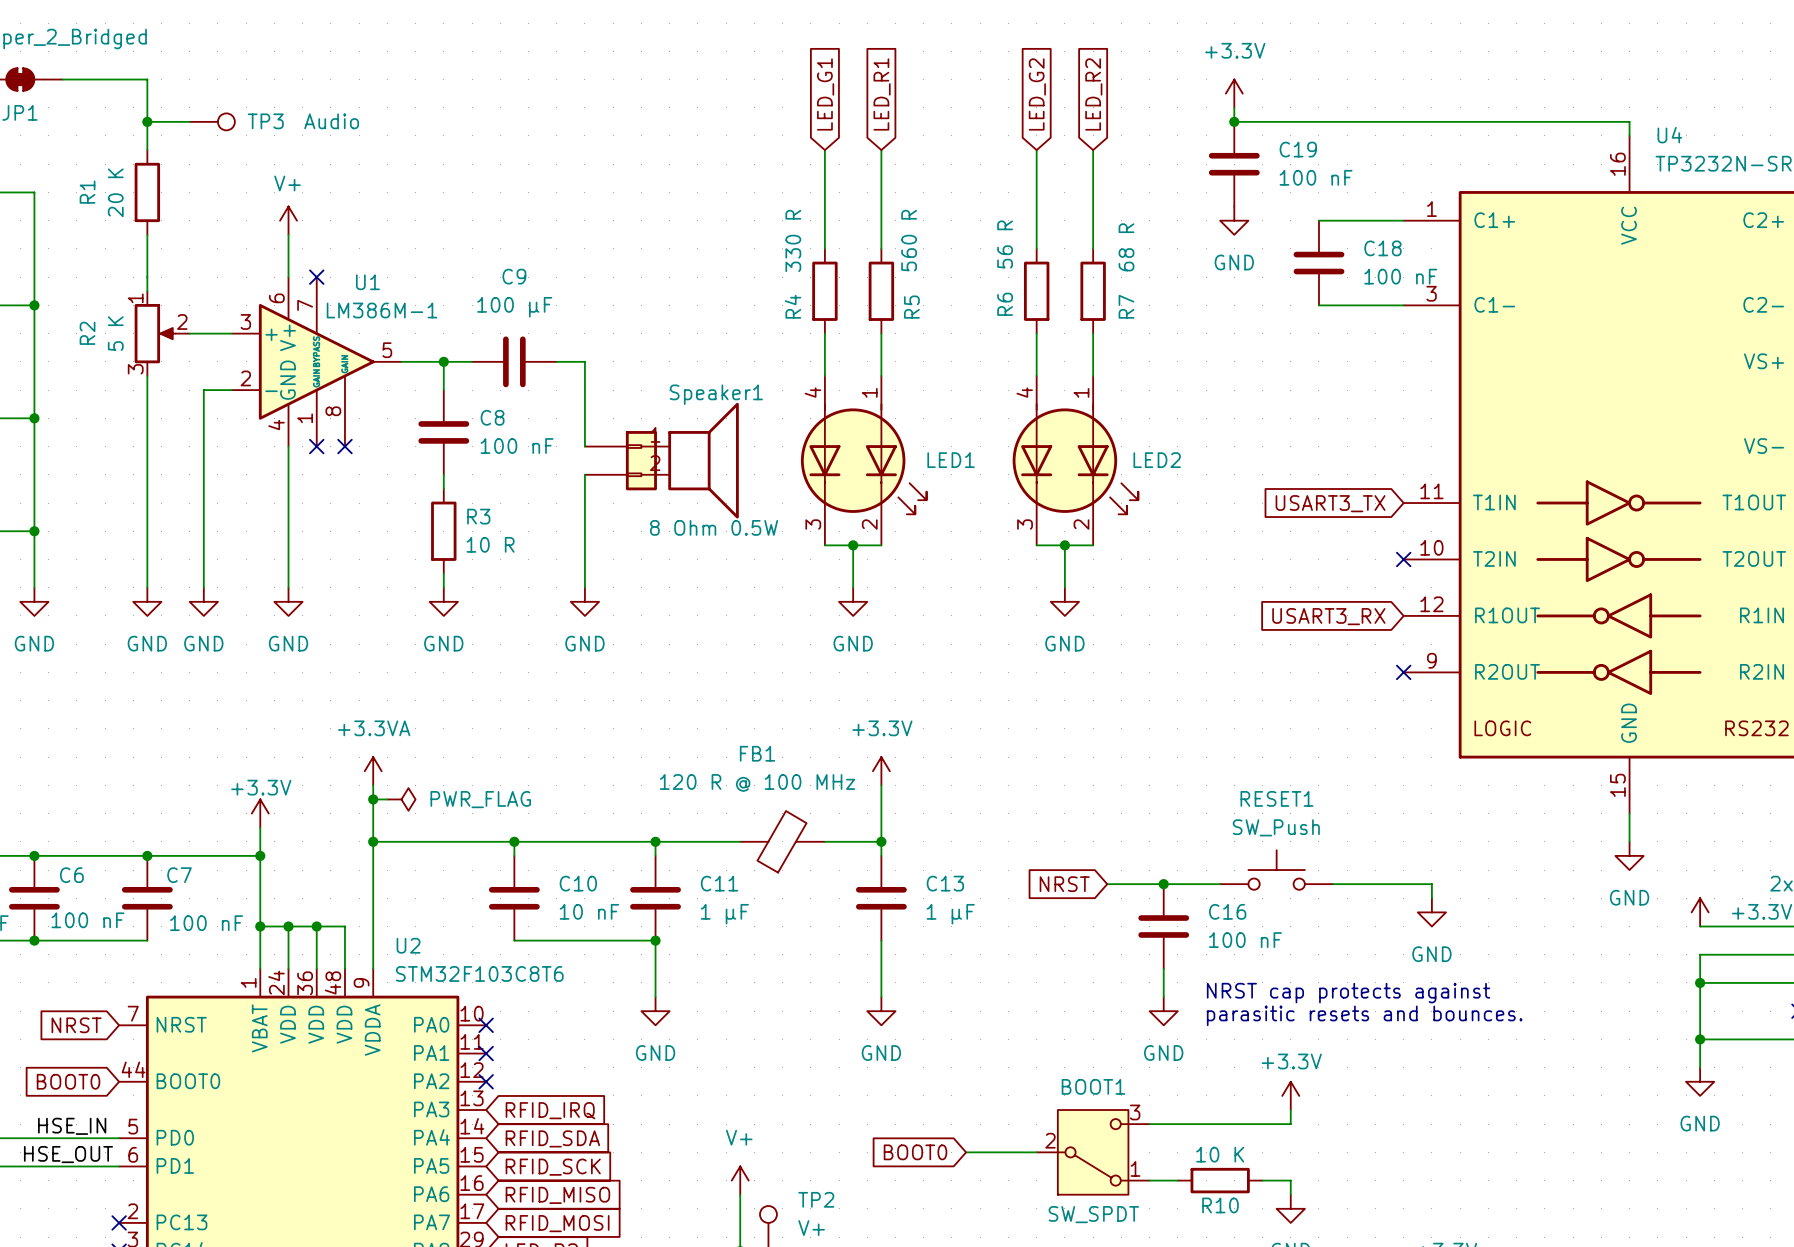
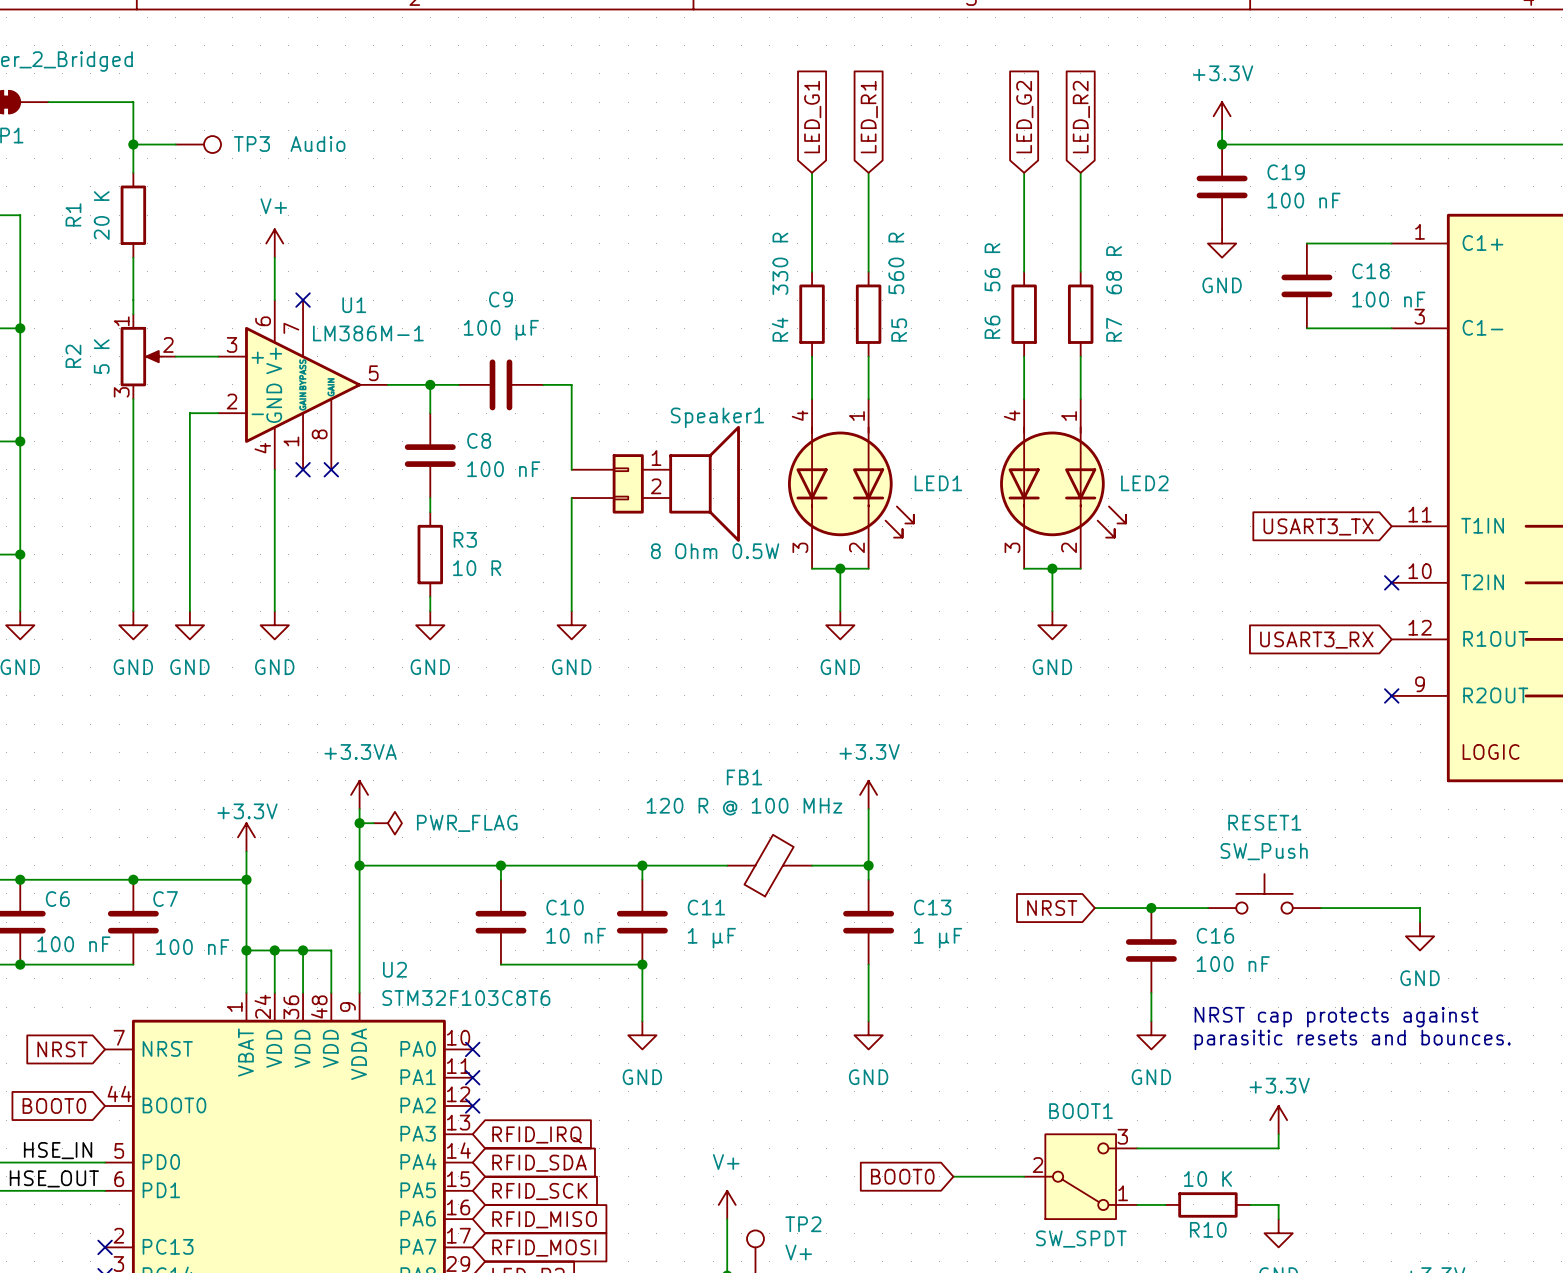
Speaker1 position: (690, 460) -> (691, 483)

